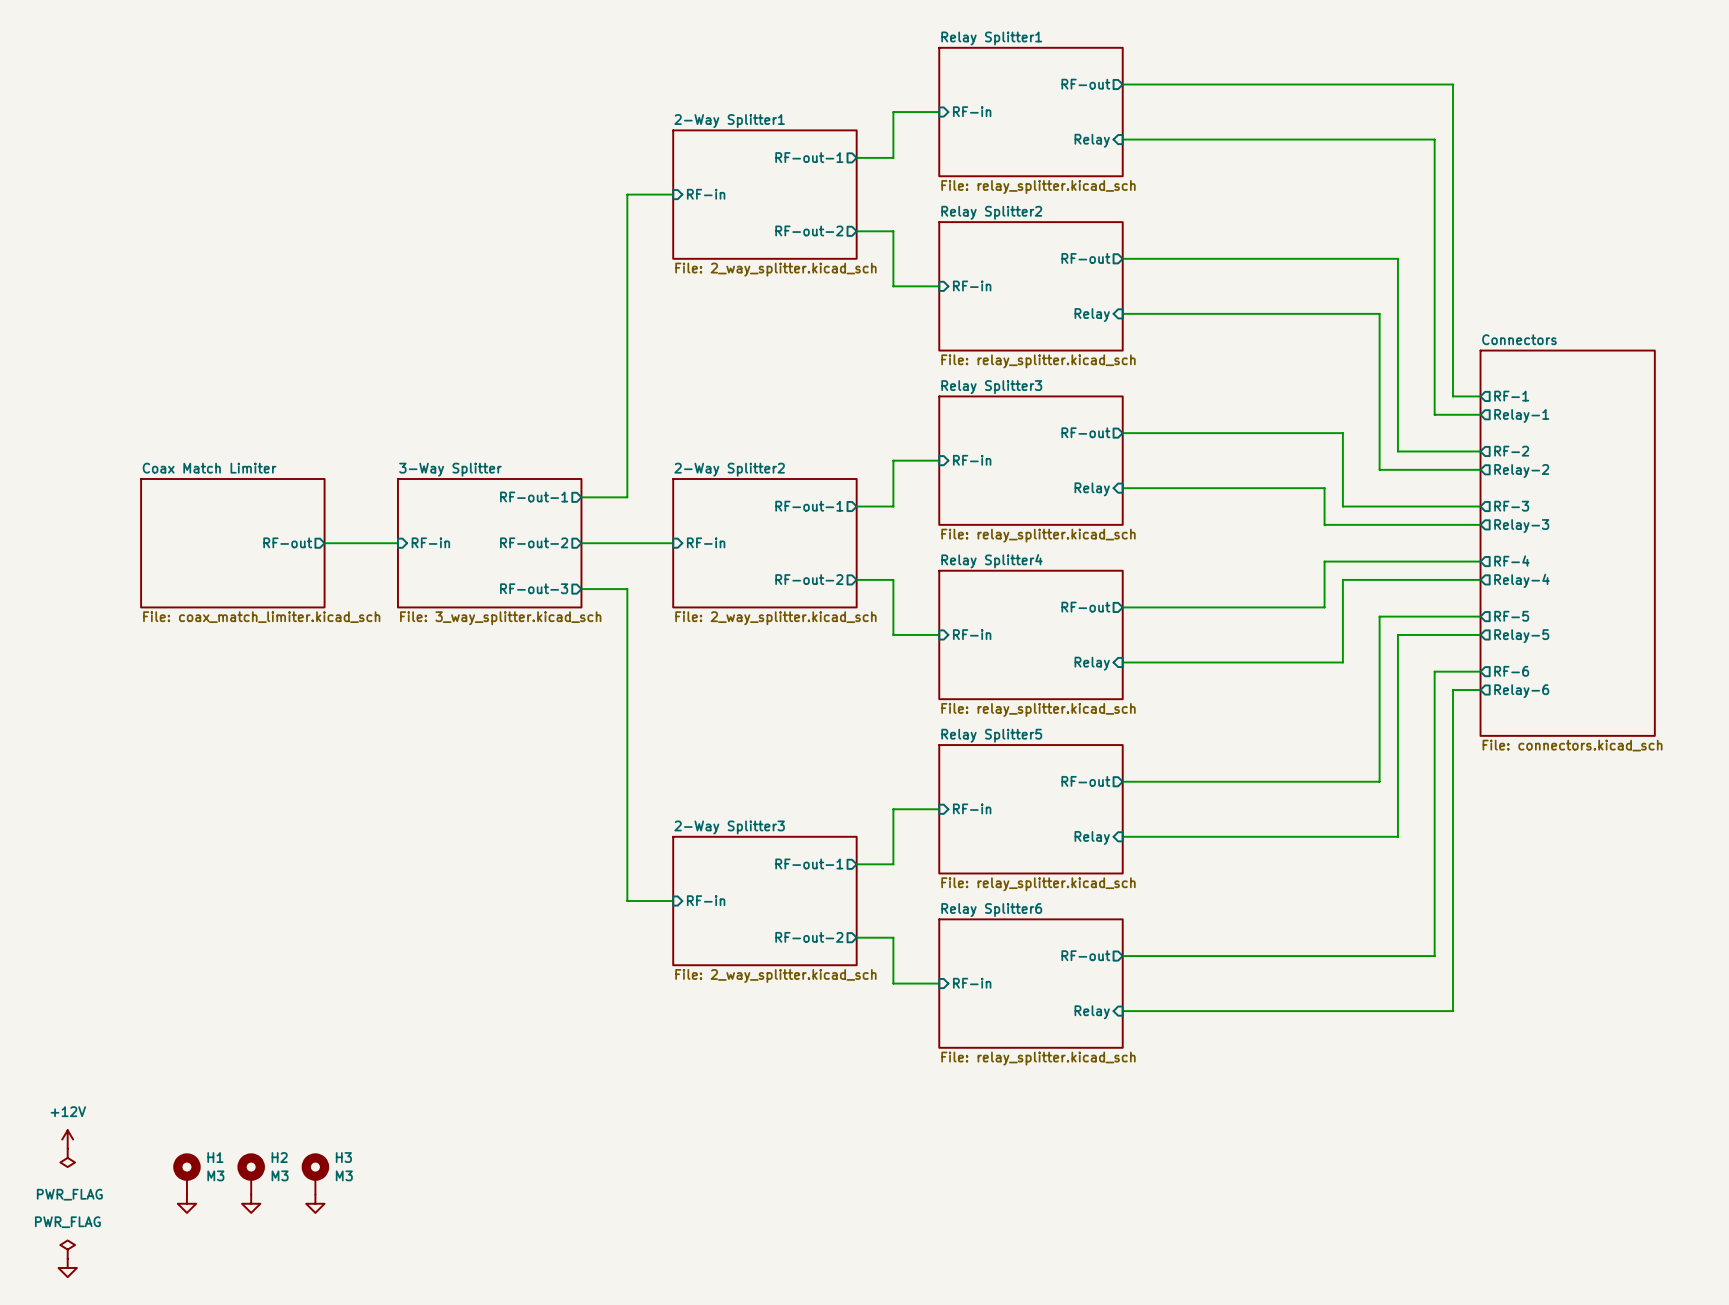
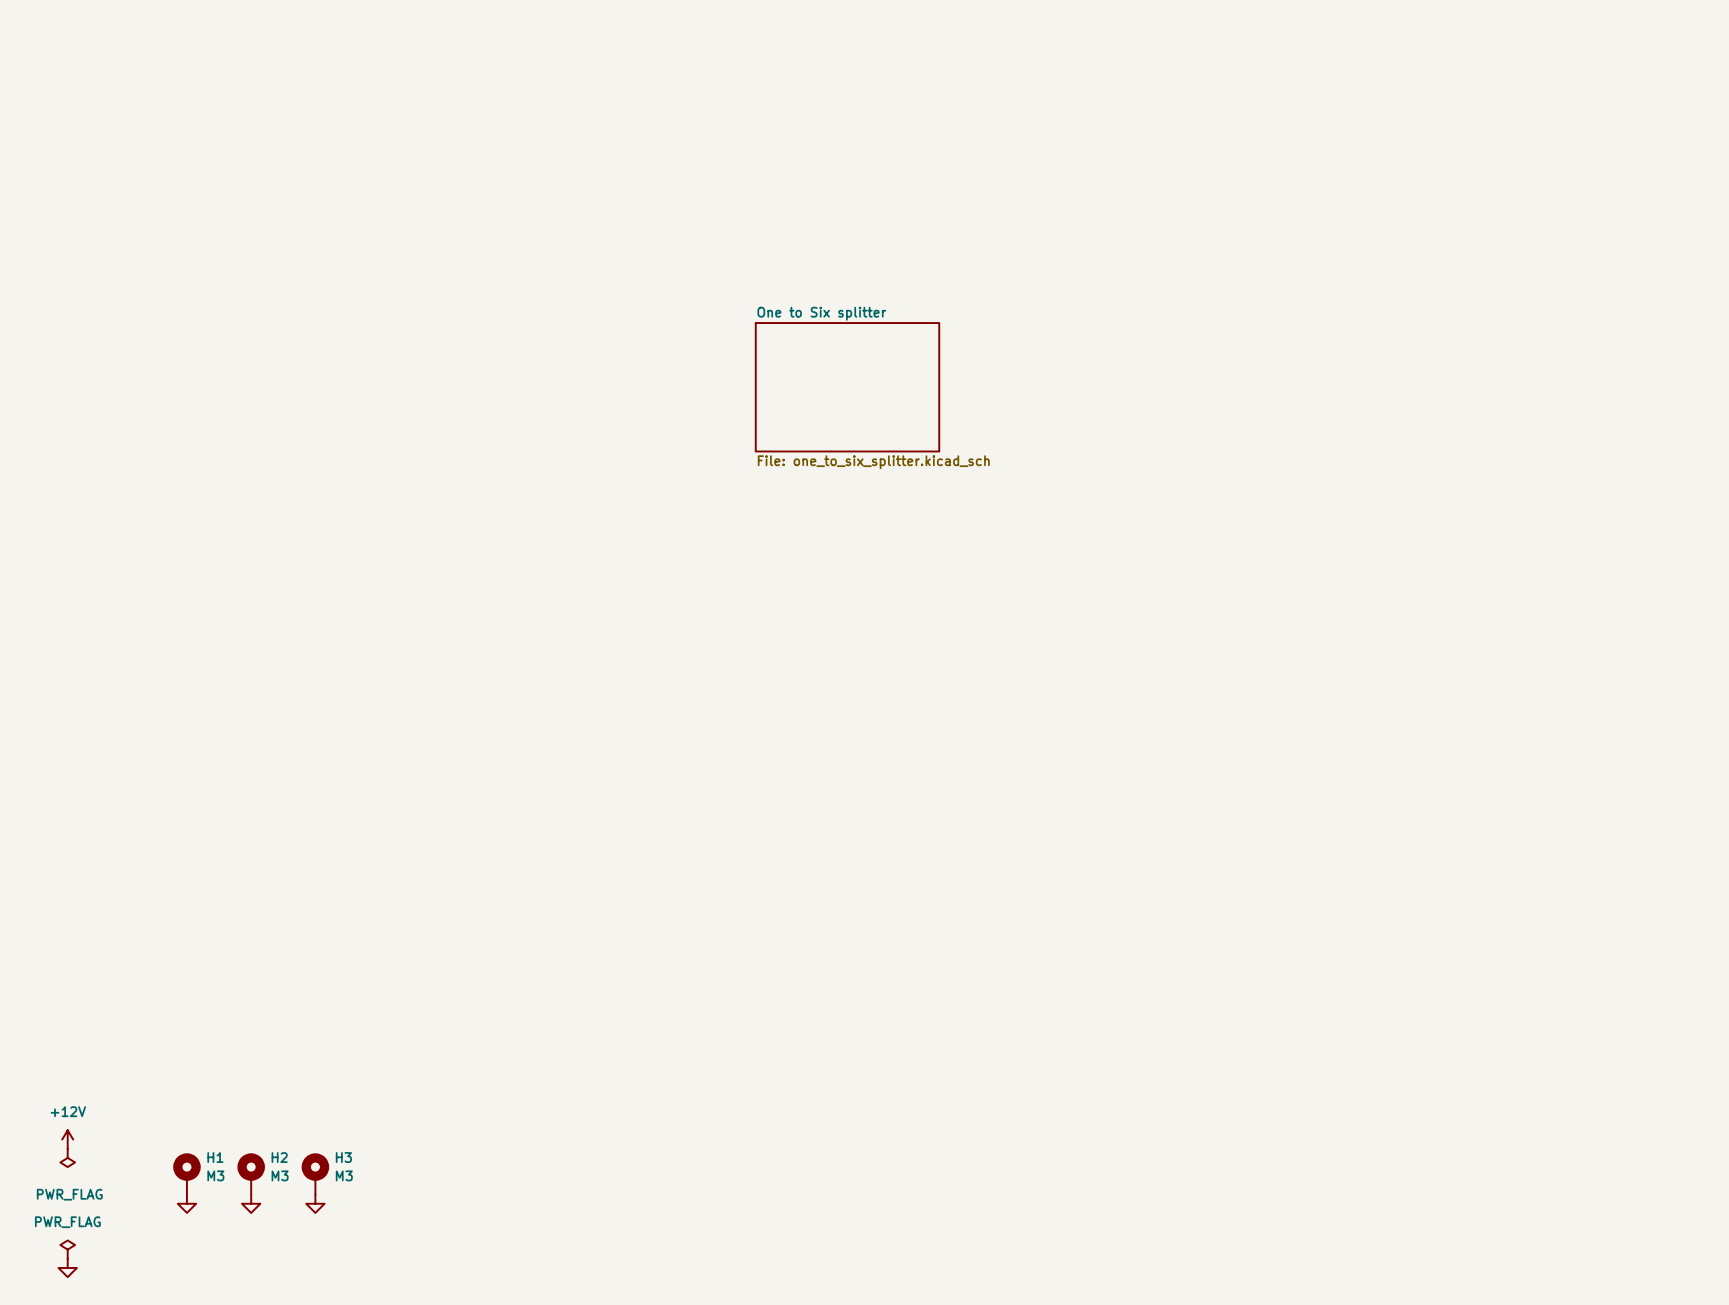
sheet pin: RF-out (1085, 84) -> none
wire: (1122, 84) (1453, 84) (1453, 396) (1480, 396) -> none
sheet pin: RF-in (972, 111) -> none
wire: (939, 112) (893, 112) (893, 157) (856, 157) -> none
sheet Relay Splitter1: File: relay_splitter.kicad_sch (1030, 112) -> none
wire: (1122, 139) (1434, 139) (1434, 414) (1480, 414) -> none
sheet pin: Relay (1092, 140) -> none
sheet pin: RF-out-1 (809, 157) -> none
wire: (673, 194) (627, 194) (627, 497) (581, 497) -> none
sheet pin: RF-in (706, 194) -> none
sheet 2-Way Splitter1: File: 2_way_splitter.kicad_sch (764, 194) -> none
sheet pin: RF-out-2 (809, 230) -> none
wire: (856, 231) (893, 231) (893, 286) (939, 286) -> none
sheet pin: RF-out (1085, 258) -> none
wire: (1122, 258) (1397, 258) (1397, 451) (1480, 451) -> none
sheet pin: RF-in (972, 286) -> none
sheet Relay Splitter2: File: relay_splitter.kicad_sch (1030, 286) -> none
wire: (1122, 313) (1379, 313) (1379, 469) (1480, 469) -> none
sheet pin: Relay (1092, 315) -> none
sheet One to Six splitter: none -> File: one_to_six_splitter.kicad_sch (847, 387)
sheet pin: RF-1 (1511, 396) -> none
sheet pin: Relay-1 (1521, 415) -> none
sheet pin: RF-out (1085, 432) -> none
wire: (1122, 433) (1342, 433) (1342, 506) (1480, 506) -> none
sheet pin: RF-2 (1511, 451) -> none
wire: (939, 460) (893, 460) (893, 506) (856, 506) -> none
sheet pin: RF-in (972, 460) -> none
sheet Relay Splitter3: File: relay_splitter.kicad_sch (1030, 460) -> none
sheet pin: Relay-2 (1521, 471) -> none
wire: (1122, 488) (1324, 488) (1324, 524) (1480, 524) -> none
sheet pin: Relay (1092, 489) -> none
sheet pin: RF-out-1 (534, 497) -> none
sheet pin: RF-out-1 (809, 506) -> none
sheet pin: RF-3 (1511, 506) -> none
sheet pin: Relay-3 (1521, 526) -> none
sheet pin: RF-out (287, 542) -> none
sheet pin: RF-in (430, 542) -> none
sheet pin: RF-out-2 (534, 542) -> none
sheet pin: RF-in (706, 542) -> none
sheet Coax Match Limiter: File: coax_match_limiter.kicad_sch (232, 543) -> none
wire: (324, 543) (397, 543) -> none
sheet 3-Way Splitter: File: 3_way_splitter.kicad_sch (489, 543) -> none
wire: (581, 543) (673, 543) -> none
sheet 2-Way Splitter2: File: 2_way_splitter.kicad_sch (764, 543) -> none
sheet Connectors: File: connectors.kicad_sch (1567, 543) -> none
wire: (1480, 561) (1324, 561) (1324, 607) (1122, 607) -> none
sheet pin: RF-4 (1511, 561) -> none
sheet pin: RF-out-2 (809, 579) -> none
wire: (856, 579) (893, 579) (893, 634) (939, 634) -> none
wire: (1480, 579) (1342, 579) (1342, 662) (1122, 662) -> none
sheet pin: Relay-4 (1521, 580) -> none
sheet pin: RF-out-3 (534, 588) -> none
wire: (581, 589) (627, 589) (627, 901) (673, 901) -> none
sheet pin: RF-out (1085, 607) -> none
wire: (1480, 616) (1379, 616) (1379, 781) (1122, 781) -> none
sheet pin: RF-5 (1511, 616) -> none
sheet pin: RF-in (972, 634) -> none
sheet Relay Splitter4: File: relay_splitter.kicad_sch (1030, 634) -> none
wire: (1480, 634) (1397, 634) (1397, 836) (1122, 836) -> none
sheet pin: Relay-5 (1521, 636) -> none
sheet pin: Relay (1092, 663) -> none
wire: (1480, 671) (1434, 671) (1434, 956) (1122, 956) -> none
sheet pin: RF-6 (1511, 671) -> none
wire: (1480, 690) (1453, 690) (1453, 1011) (1122, 1011) -> none
sheet pin: Relay-6 (1521, 691) -> none
sheet pin: RF-out (1085, 781) -> none
sheet pin: RF-in (972, 808) -> none
wire: (939, 809) (893, 809) (893, 864) (856, 864) -> none
sheet Relay Splitter5: File: relay_splitter.kicad_sch (1030, 809) -> none
sheet pin: Relay (1092, 837) -> none
sheet pin: RF-out-1 (809, 863) -> none
sheet pin: RF-in (706, 900) -> none
sheet 2-Way Splitter3: File: 2_way_splitter.kicad_sch (764, 901) -> none
sheet pin: RF-out-2 (809, 937) -> none
wire: (856, 937) (893, 937) (893, 983) (939, 983) -> none
sheet pin: RF-out (1085, 955) -> none
sheet pin: RF-in (972, 983) -> none
sheet Relay Splitter6: File: relay_splitter.kicad_sch (1030, 983) -> none
sheet pin: Relay (1092, 1012) -> none

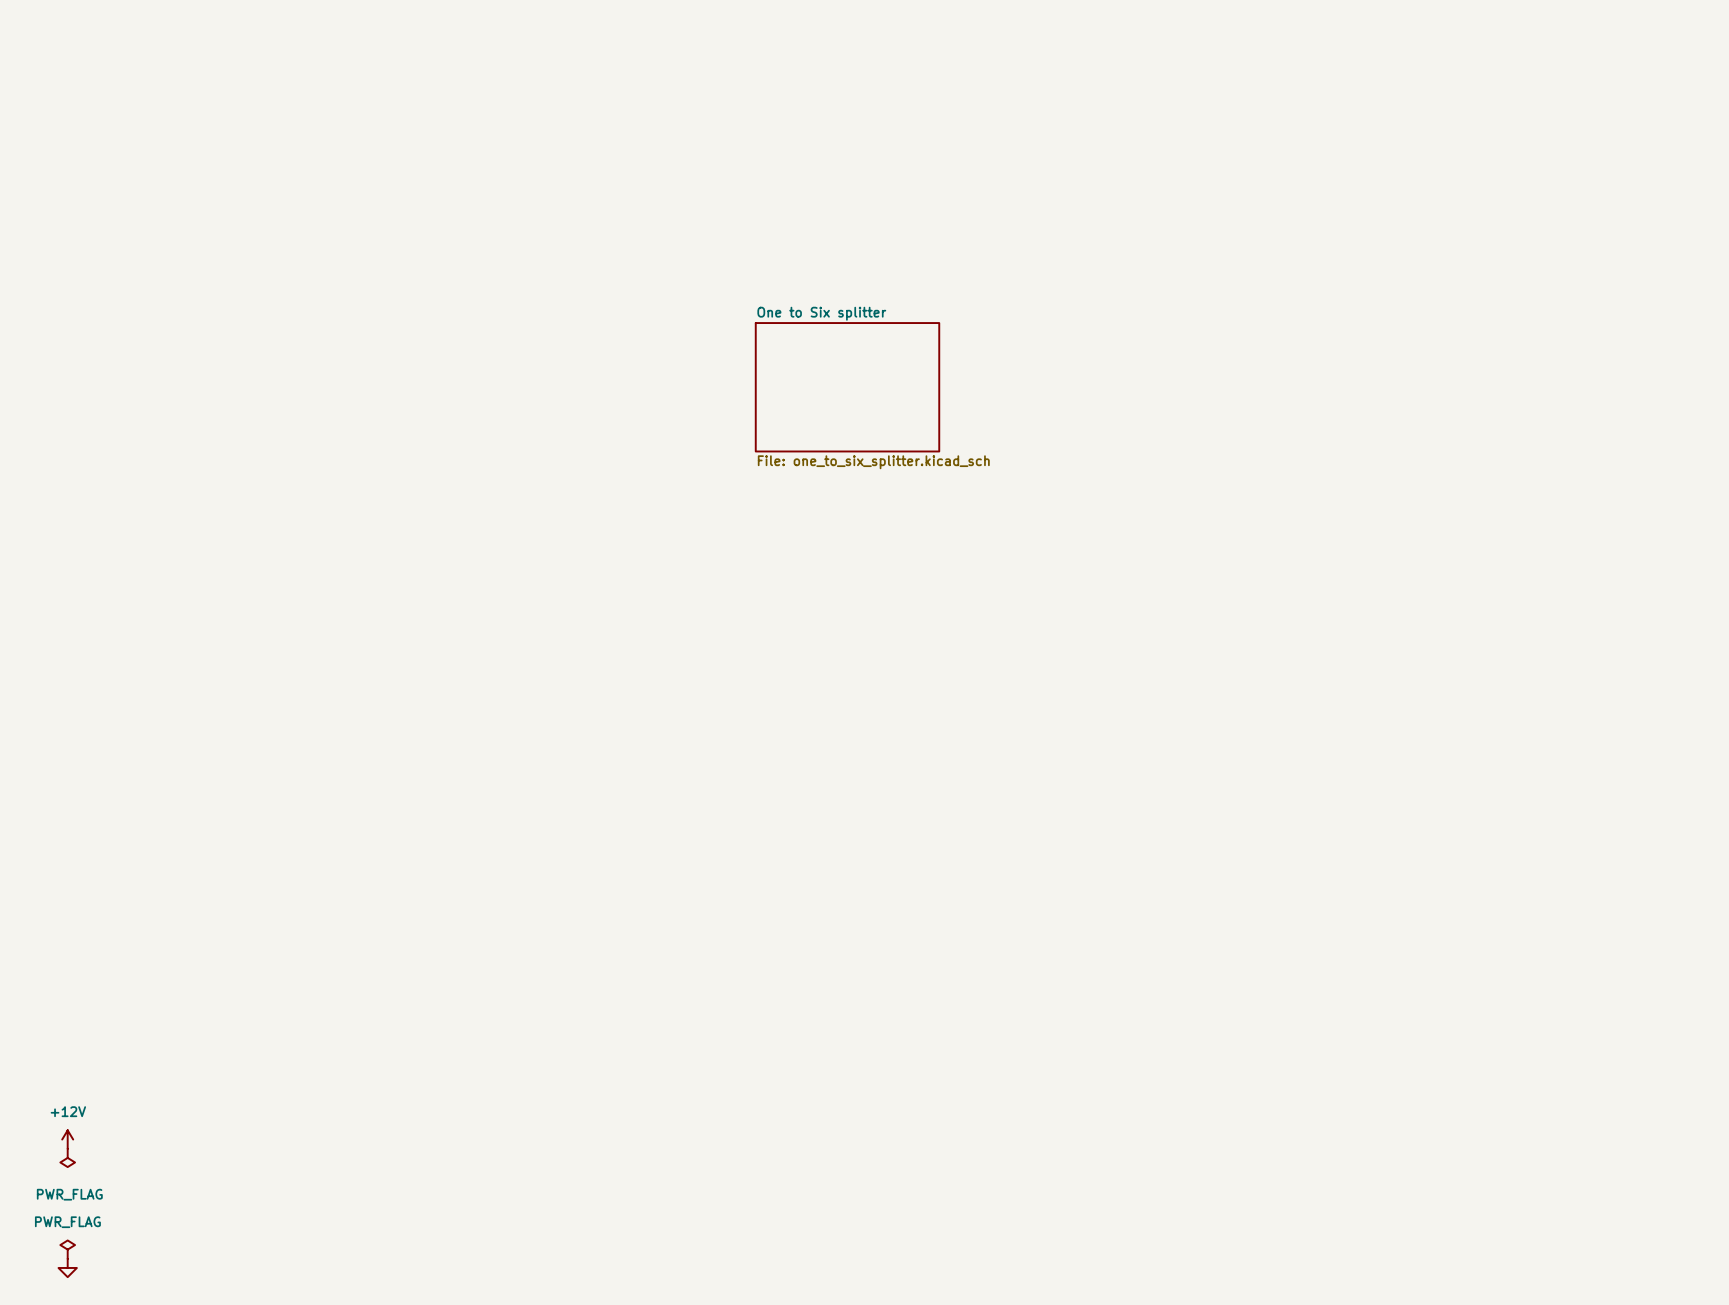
H1: M3 (186, 1173) -> none
H2: M3 (251, 1173) -> none
H3: M3 (315, 1173) -> none
power symbol: (186, 1203) -> none
power symbol: (251, 1203) -> none
power symbol: (315, 1203) -> none

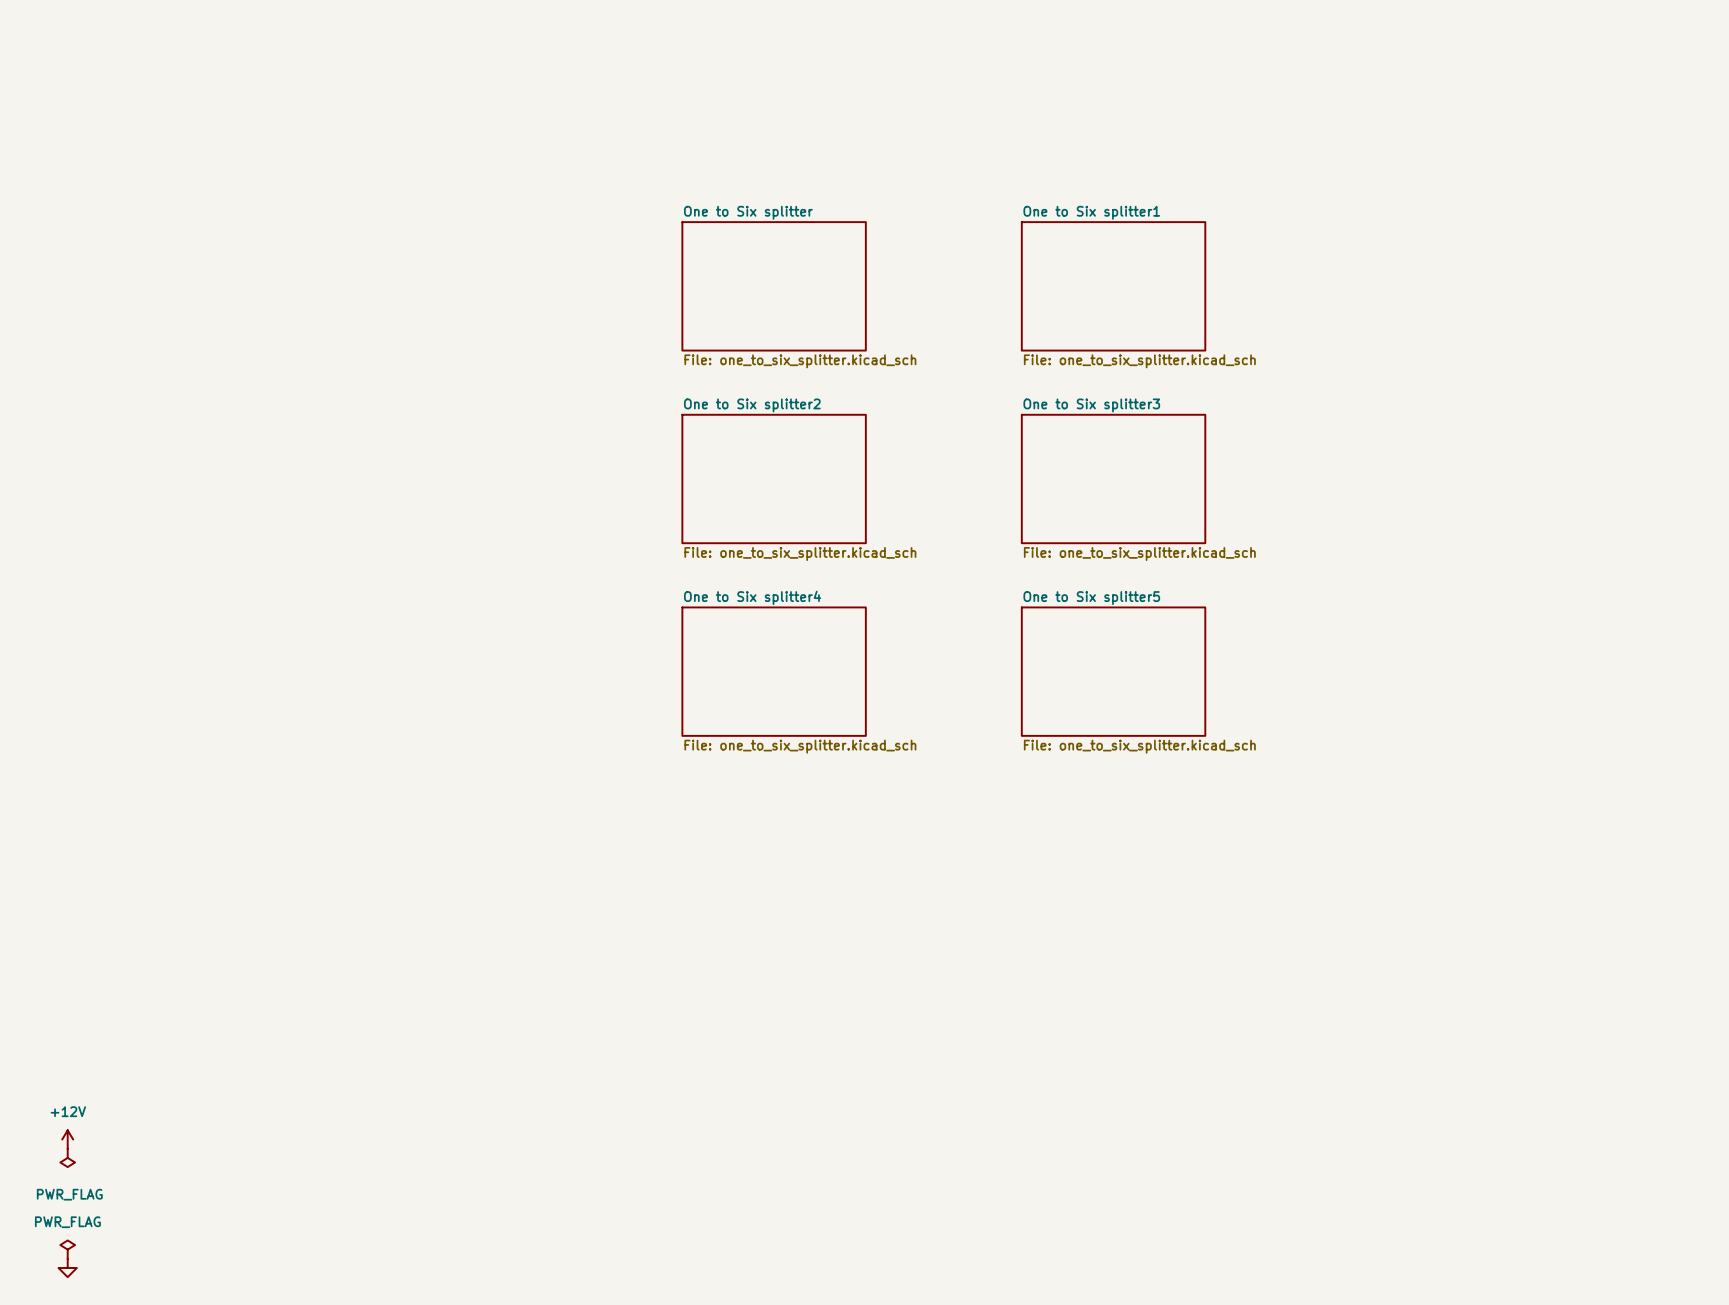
sheet One to Six splitter1: none -> File: one_to_six_splitter.kicad_sch (1113, 286)
sheet One to Six splitter position: (847, 387) -> (774, 286)
sheet One to Six splitter2: none -> File: one_to_six_splitter.kicad_sch (774, 479)
sheet One to Six splitter3: none -> File: one_to_six_splitter.kicad_sch (1113, 479)
sheet One to Six splitter4: none -> File: one_to_six_splitter.kicad_sch (774, 671)
sheet One to Six splitter5: none -> File: one_to_six_splitter.kicad_sch (1113, 671)

